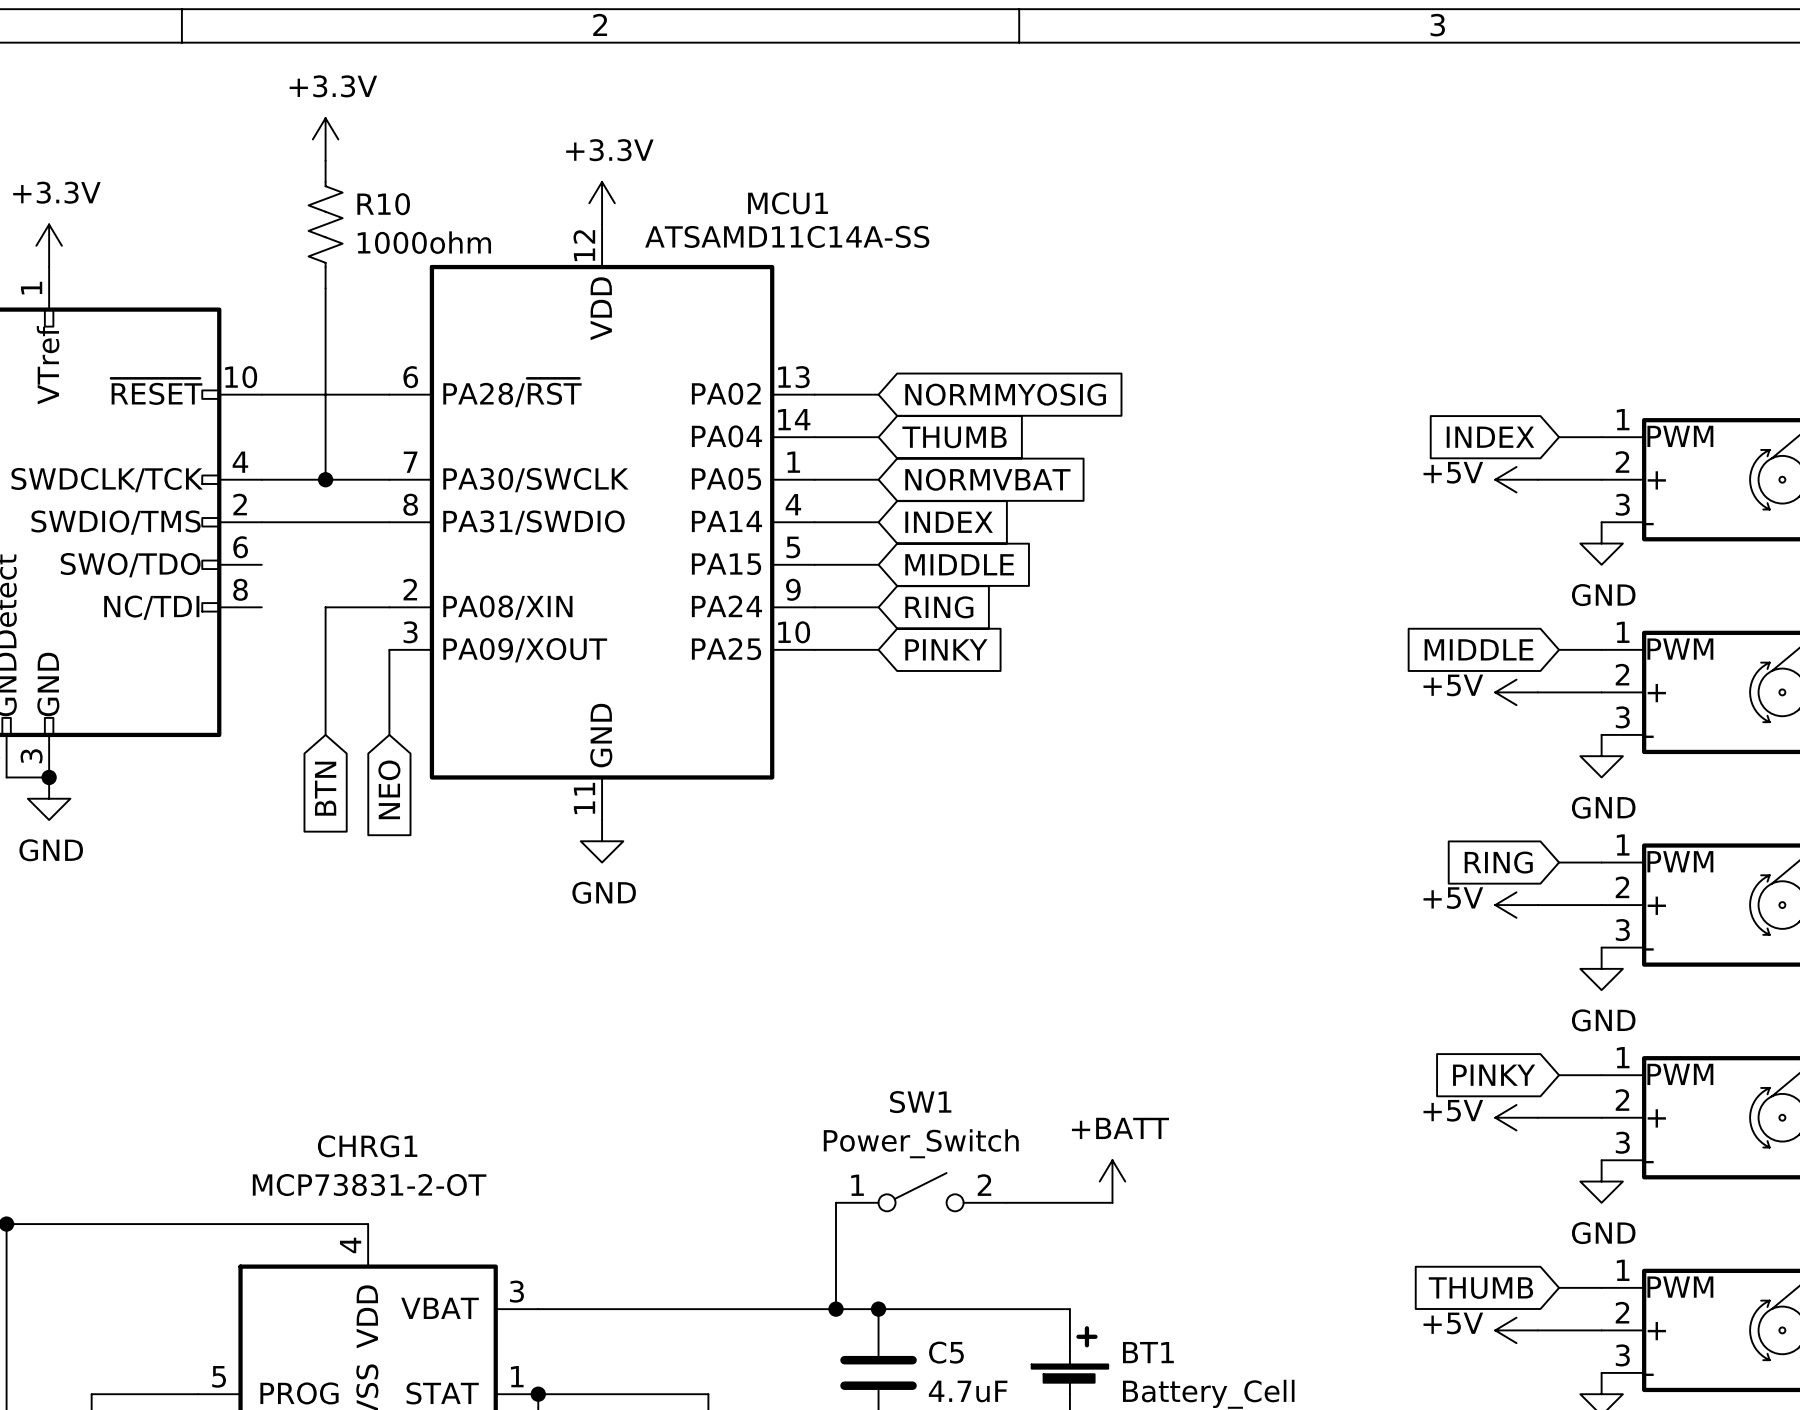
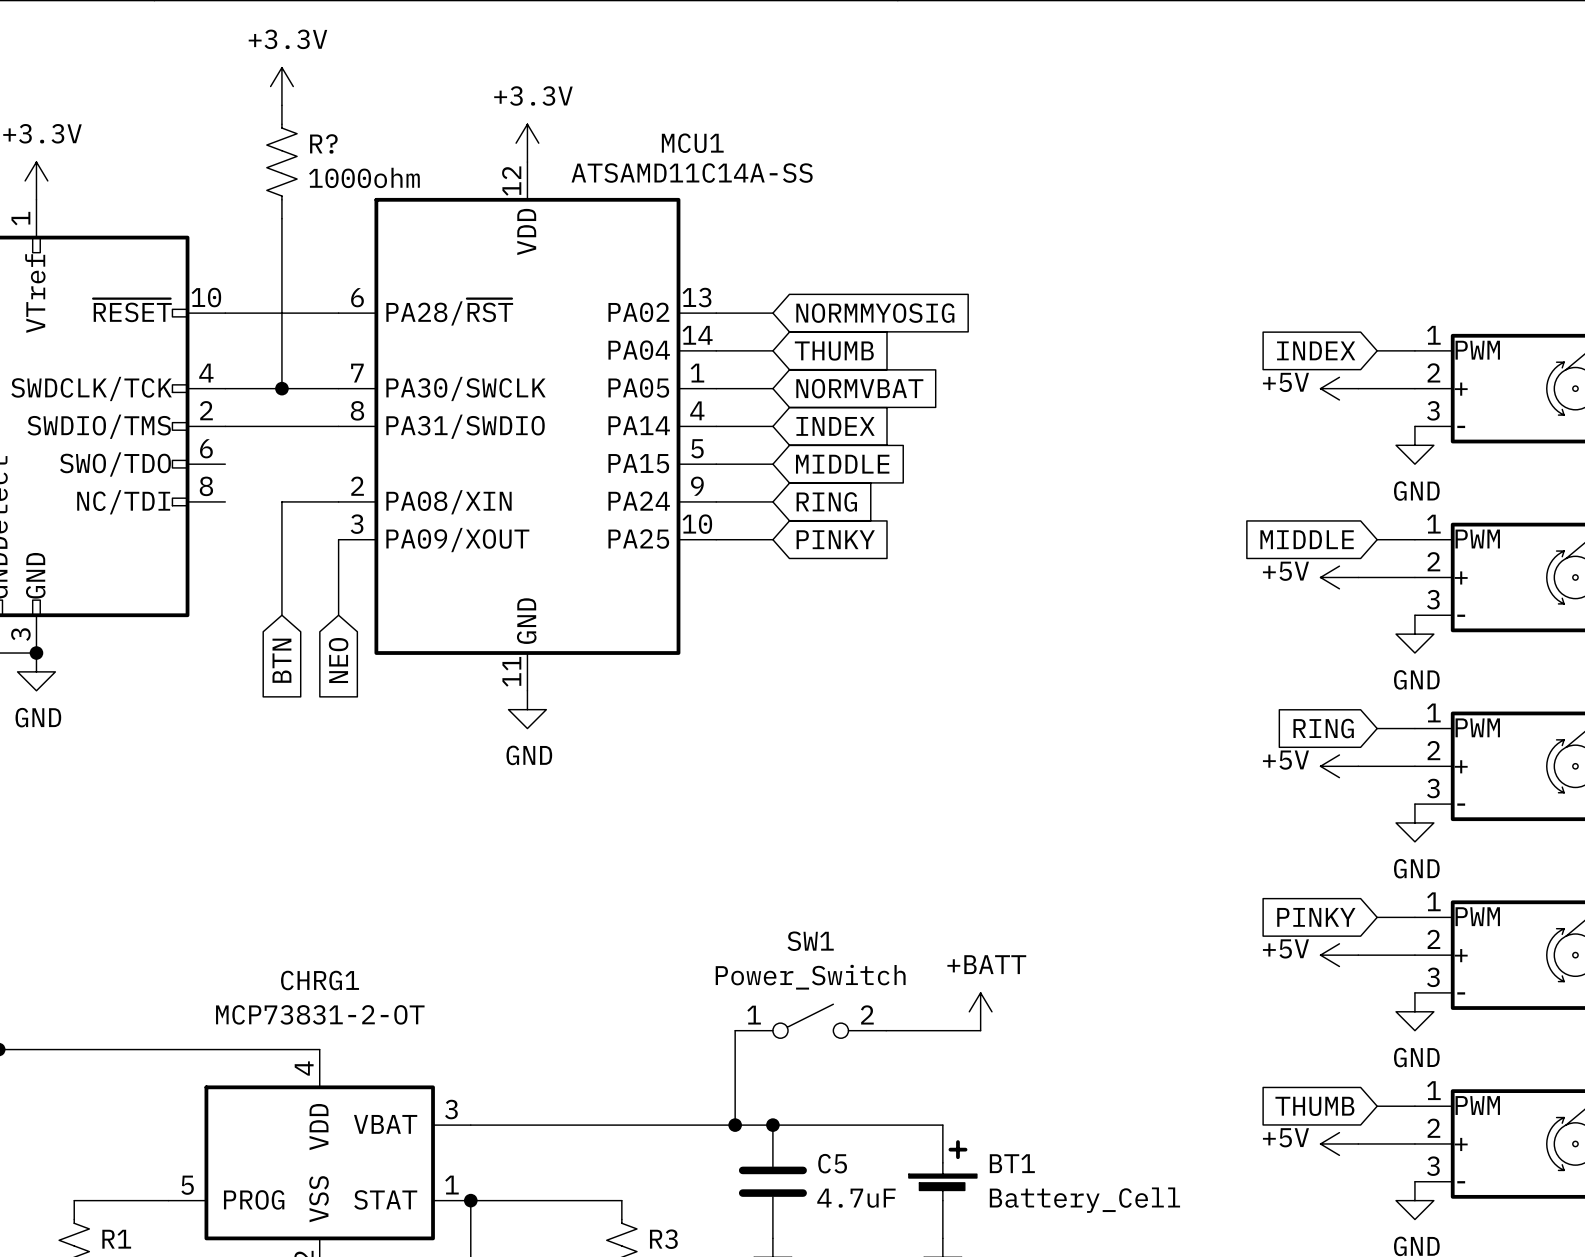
R10 name: R10 (383, 204) -> R? (323, 143)

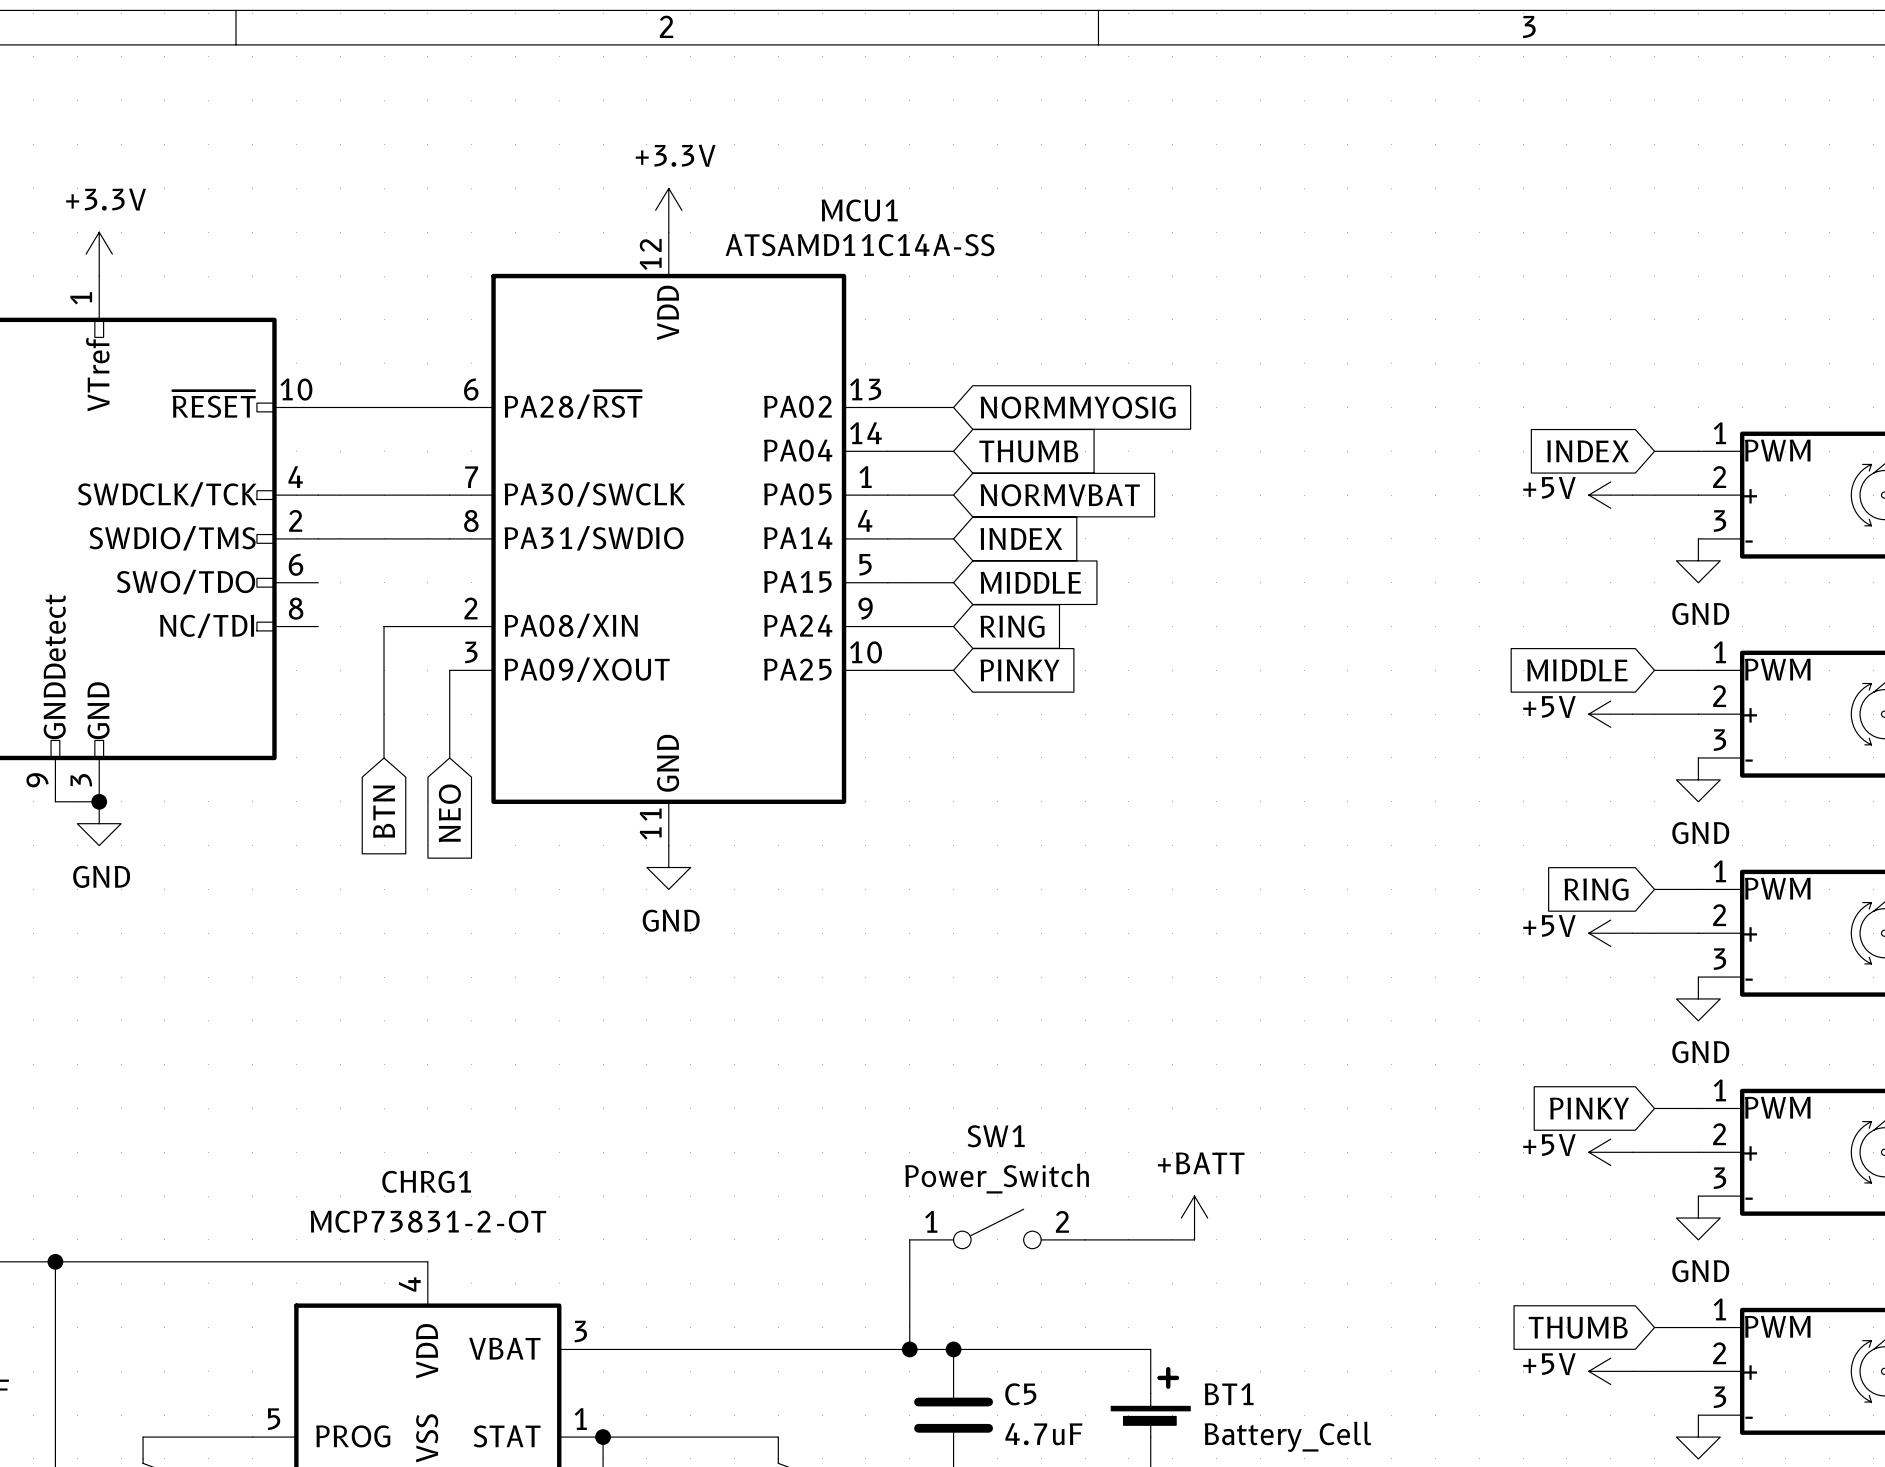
power symbol: +3.3V (281, 86) -> none
R?: 1000ohm (281, 162) -> none
wire: (281, 218) (281, 388) -> none
junction: (281, 388) -> none

